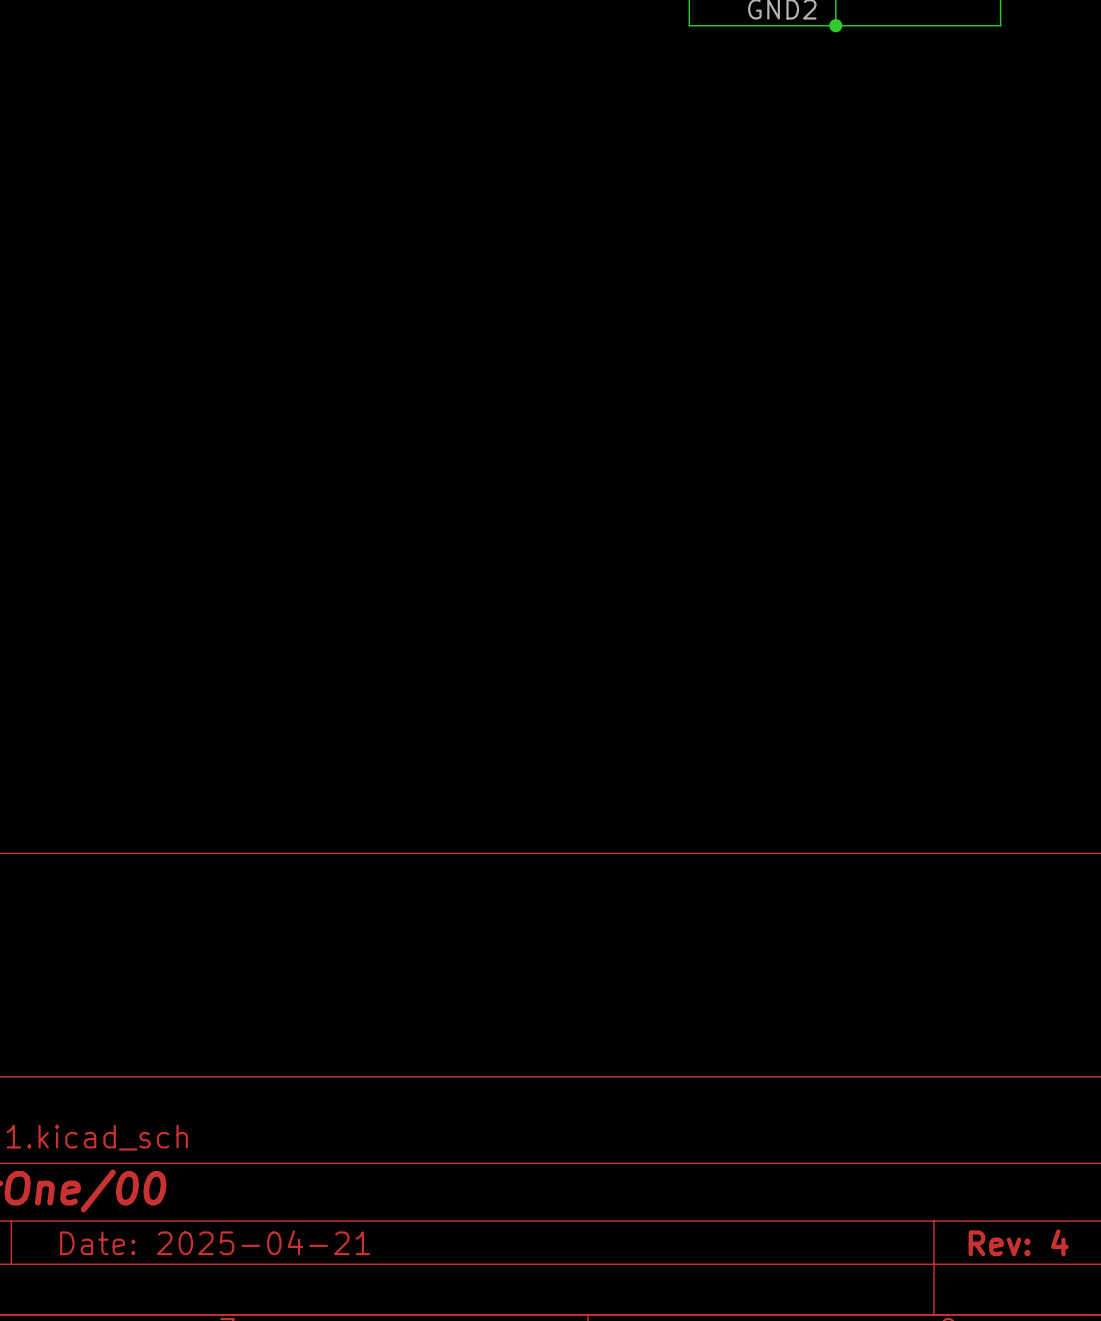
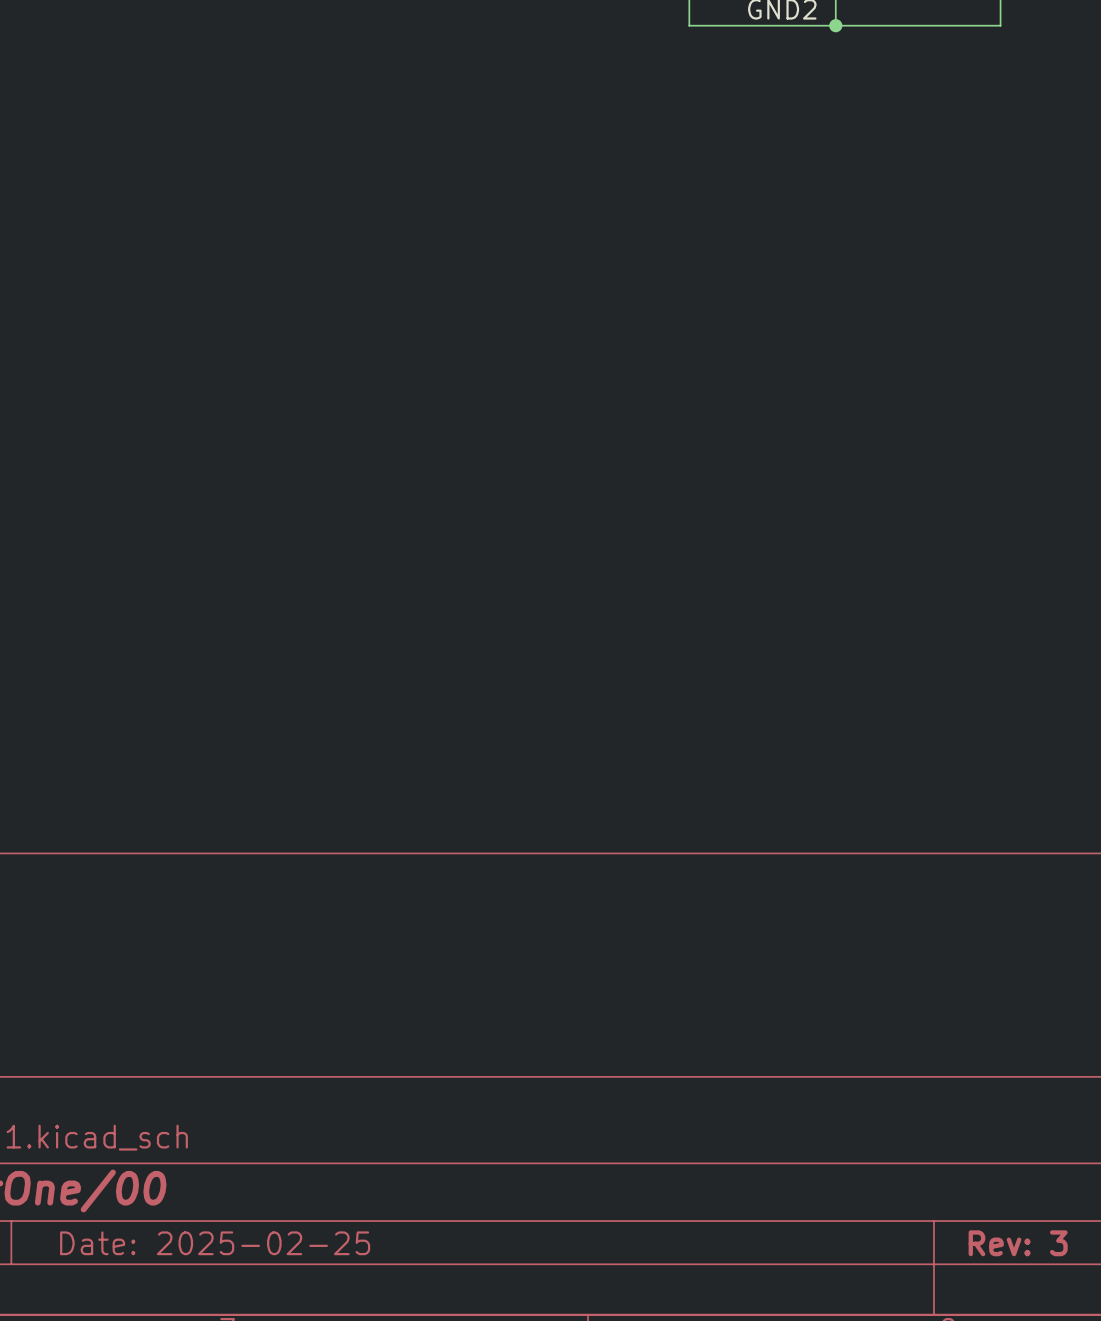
title block: Date: 2025-04-21 (215, 1242) -> Date: 2025-02-25 (215, 1243)
title block: Rev: 4 (1018, 1242) -> Rev: 3 (1018, 1243)

